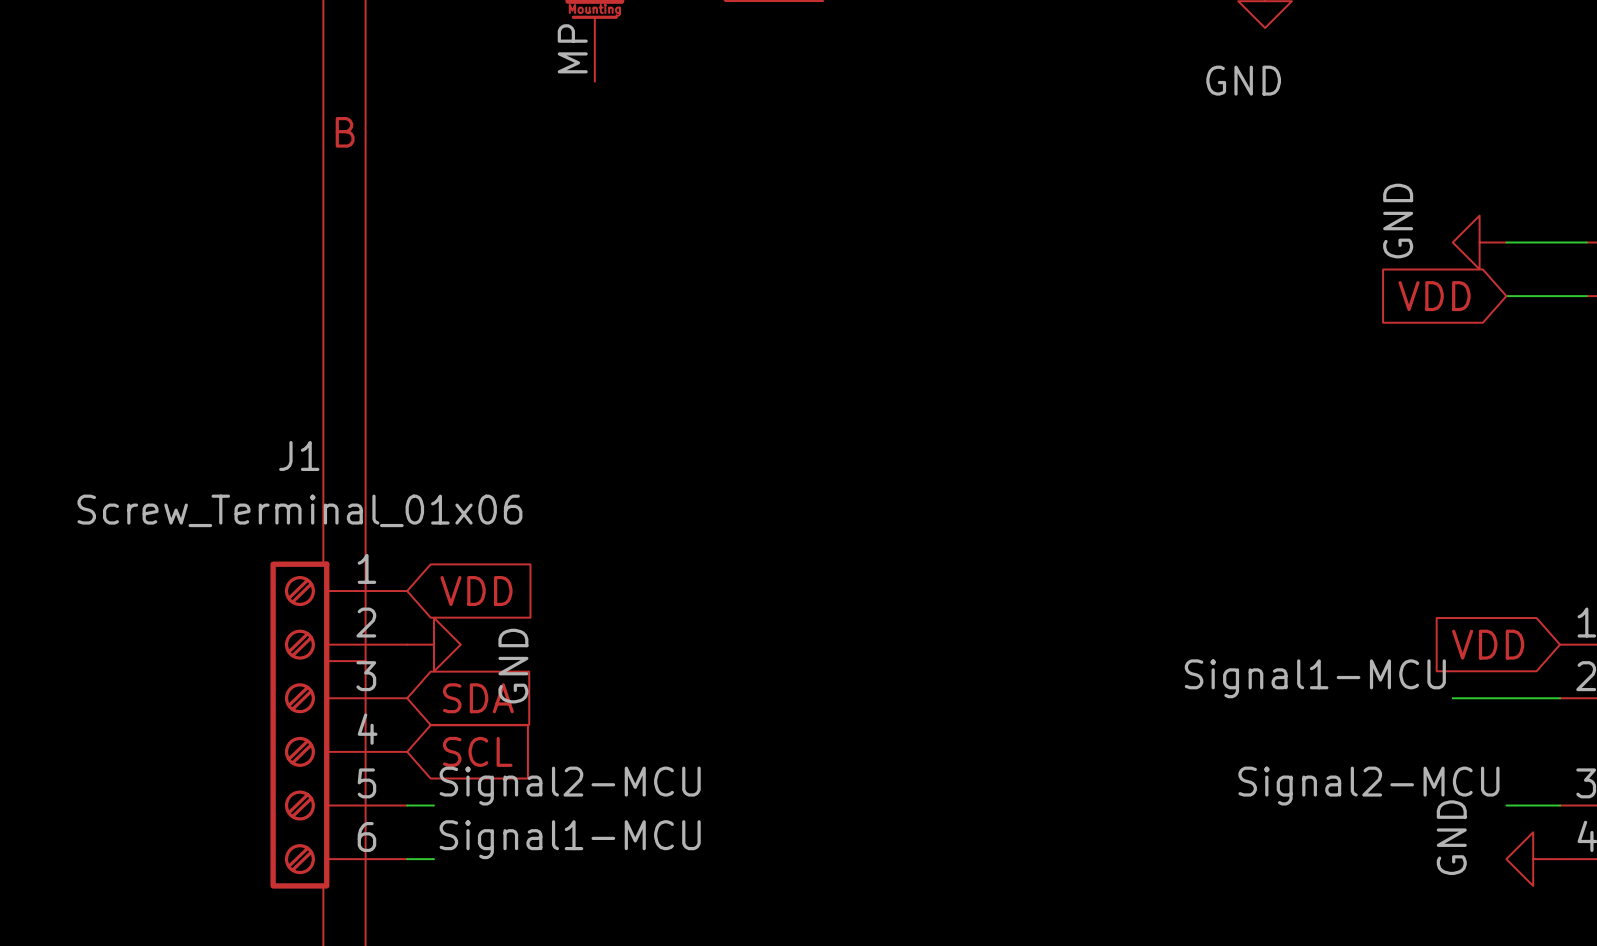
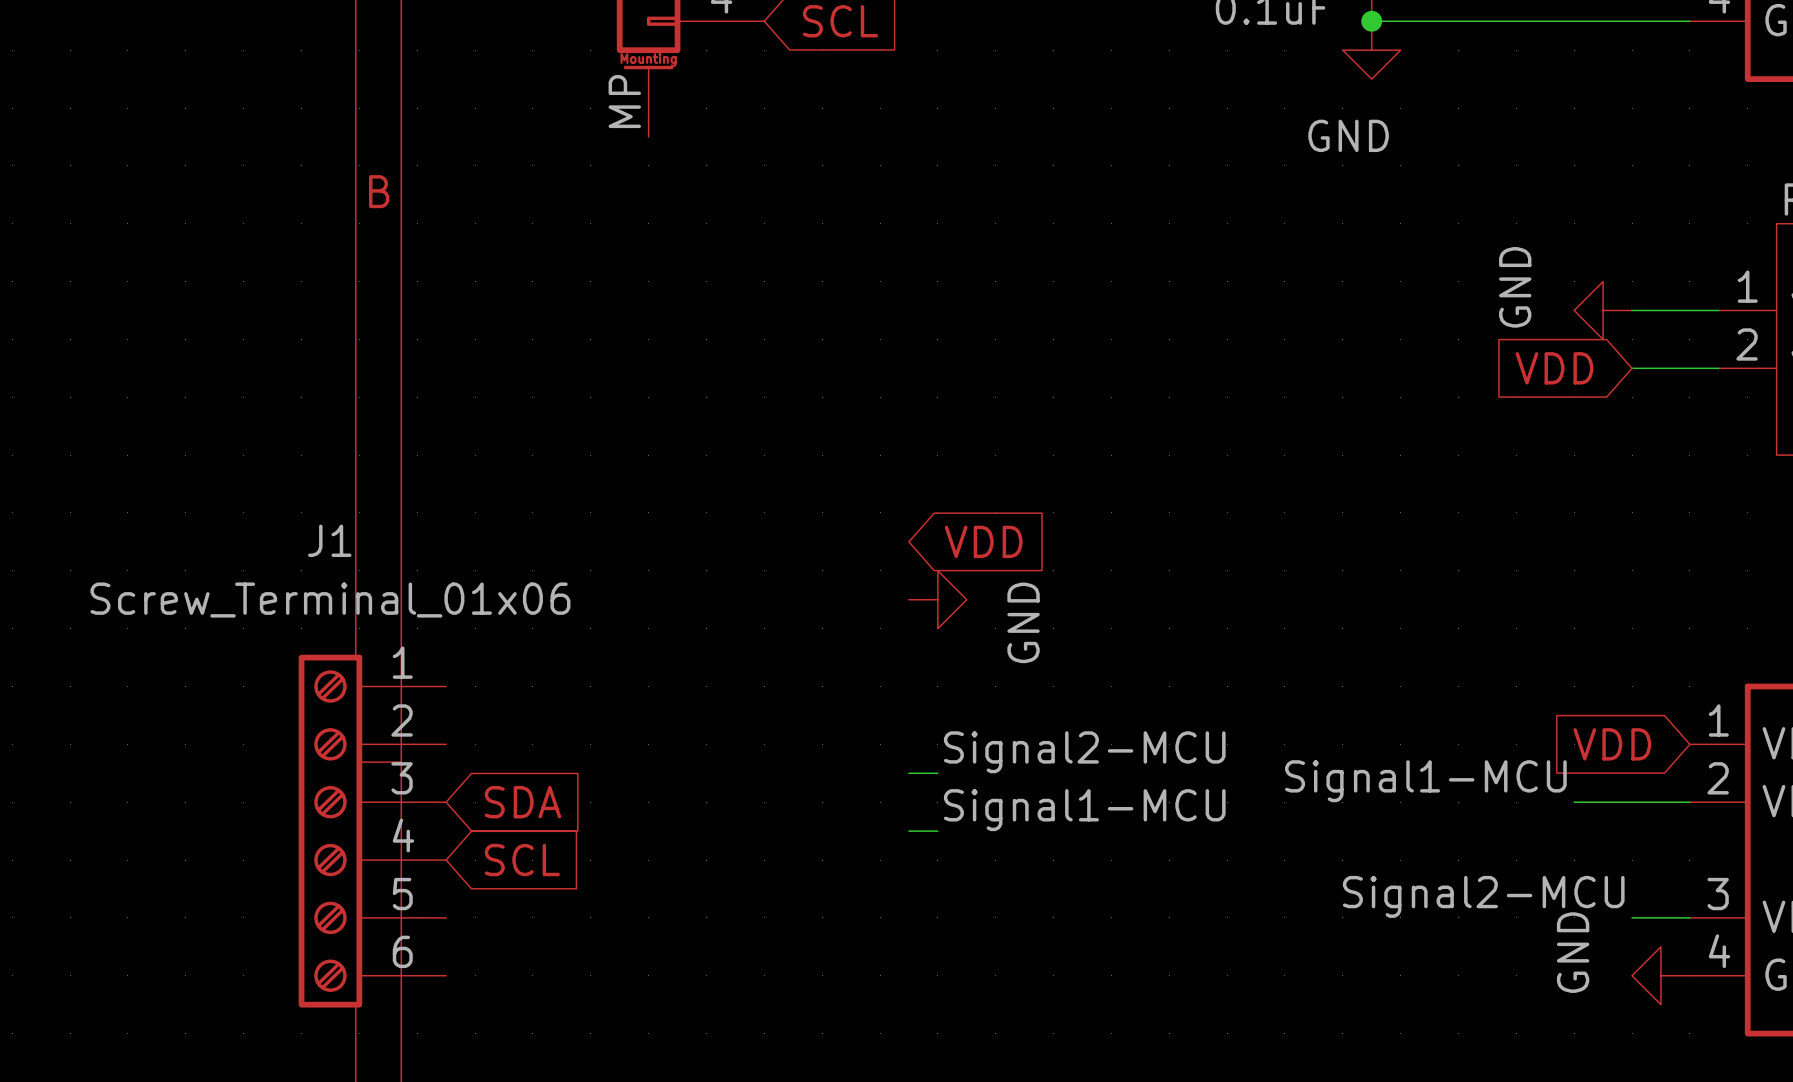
global label position: VDD (476, 591) -> VDD (983, 541)
power symbol position: GND (433, 644) -> GND (937, 599)
label position: Signal2-MCU (570, 786) -> Signal2-MCU (1084, 752)
wire: (407, 805) (433, 805) -> (908, 773) (937, 773)
label position: Signal1-MCU (570, 839) -> Signal1-MCU (1084, 810)
wire: (407, 859) (433, 859) -> (908, 831) (937, 831)

